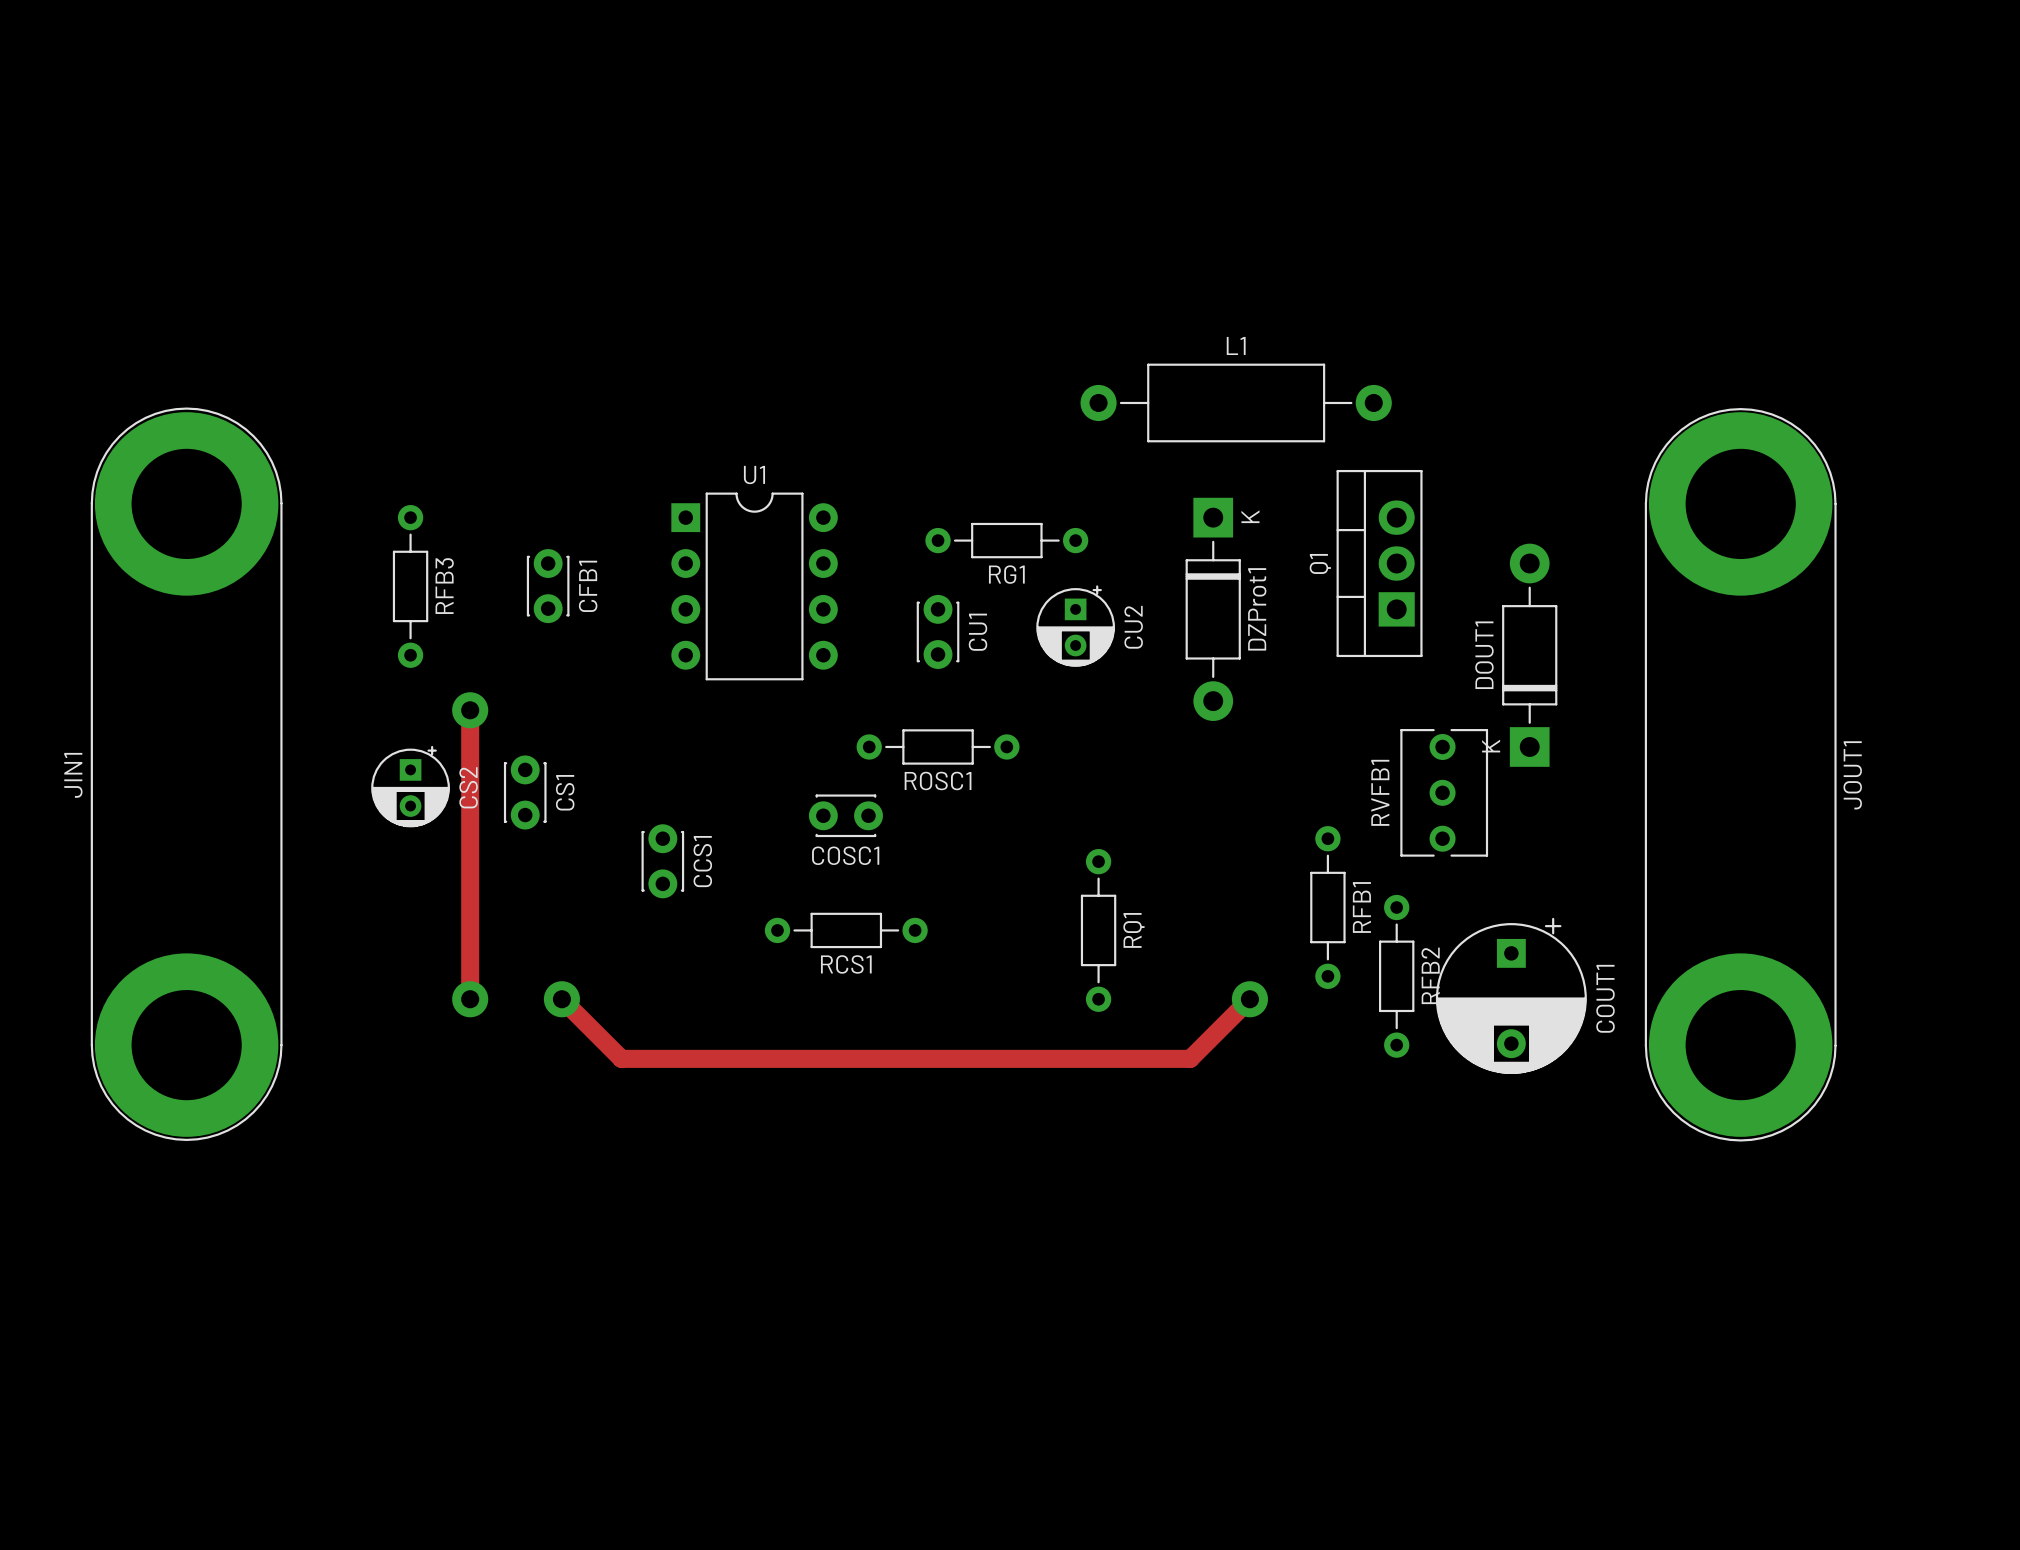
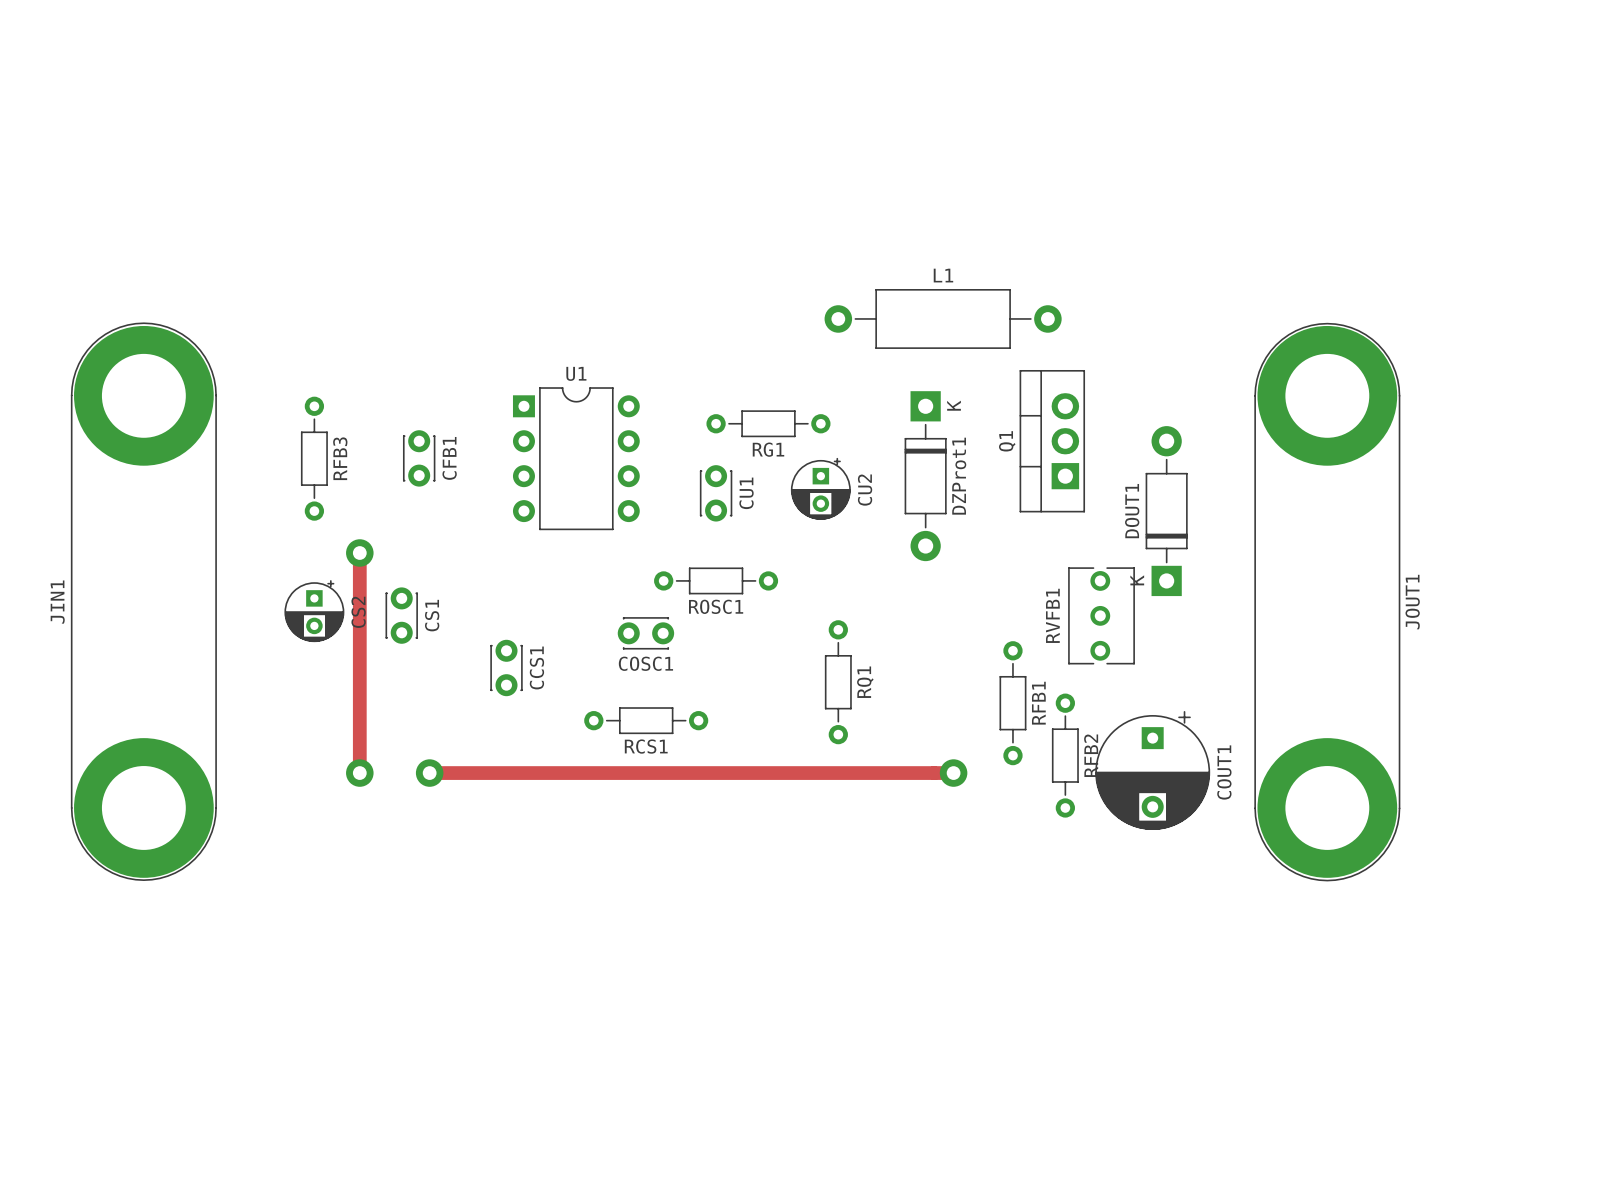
RQ1 position: (1098, 930) -> (838, 682)
track: (561, 999) (621, 1058) (1190, 1058) (1249, 999) -> (429, 773) (953, 773)

